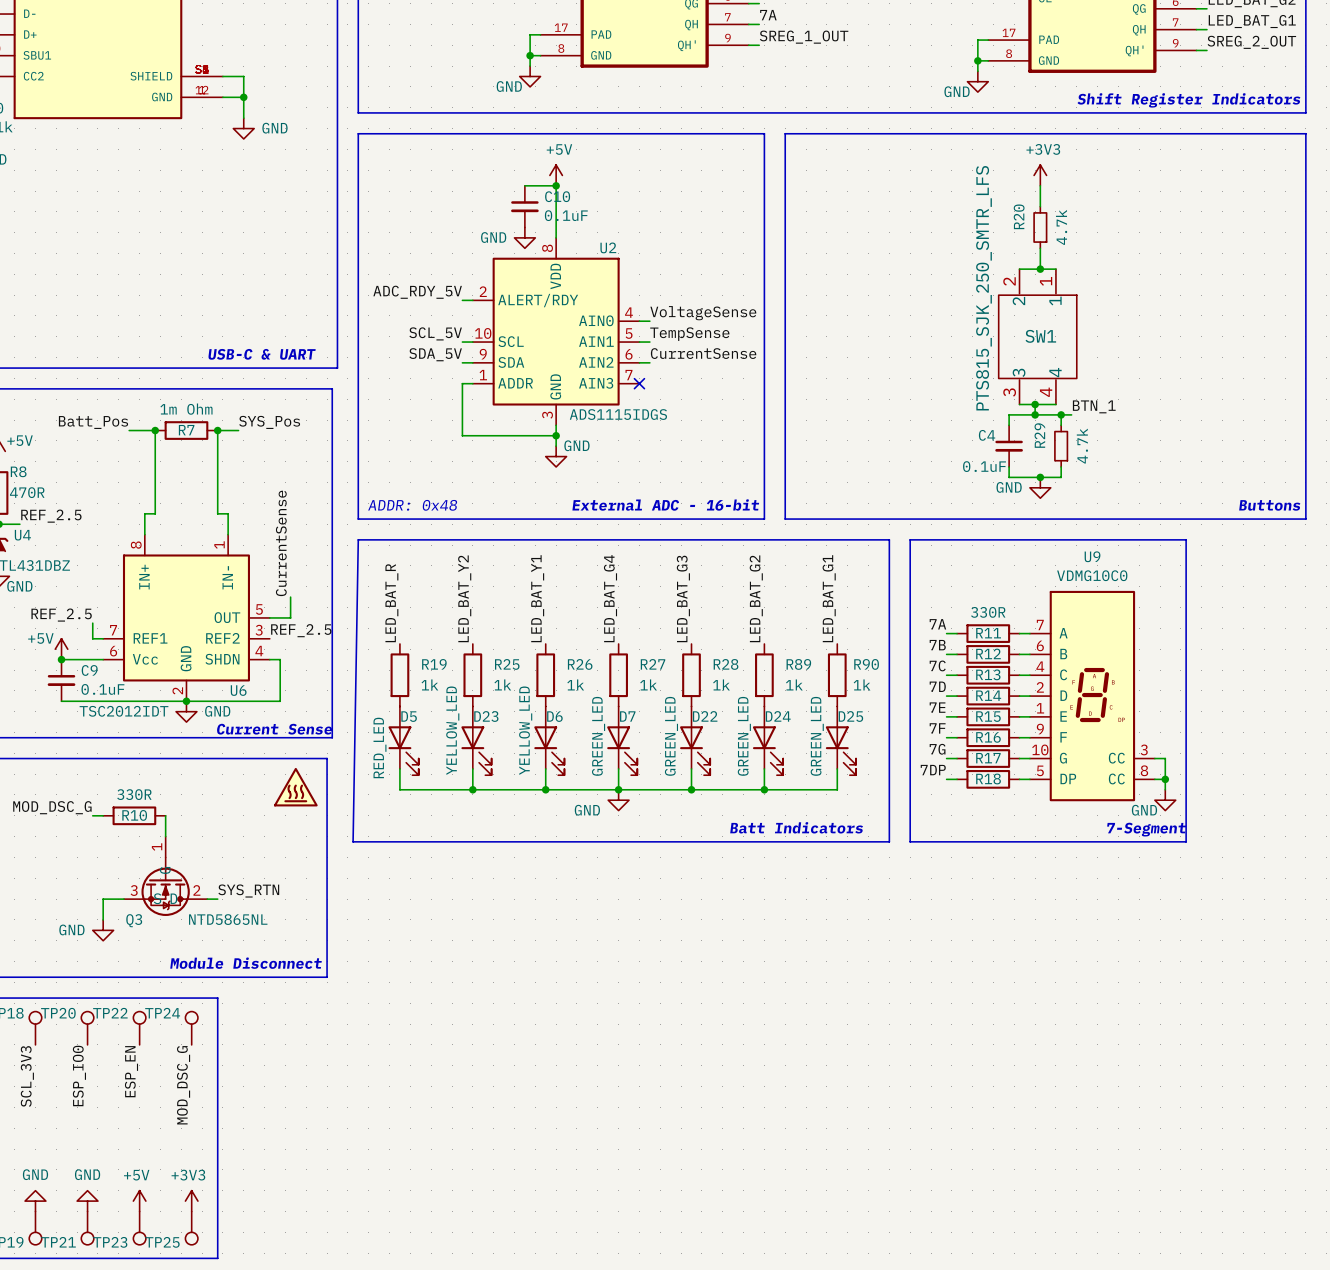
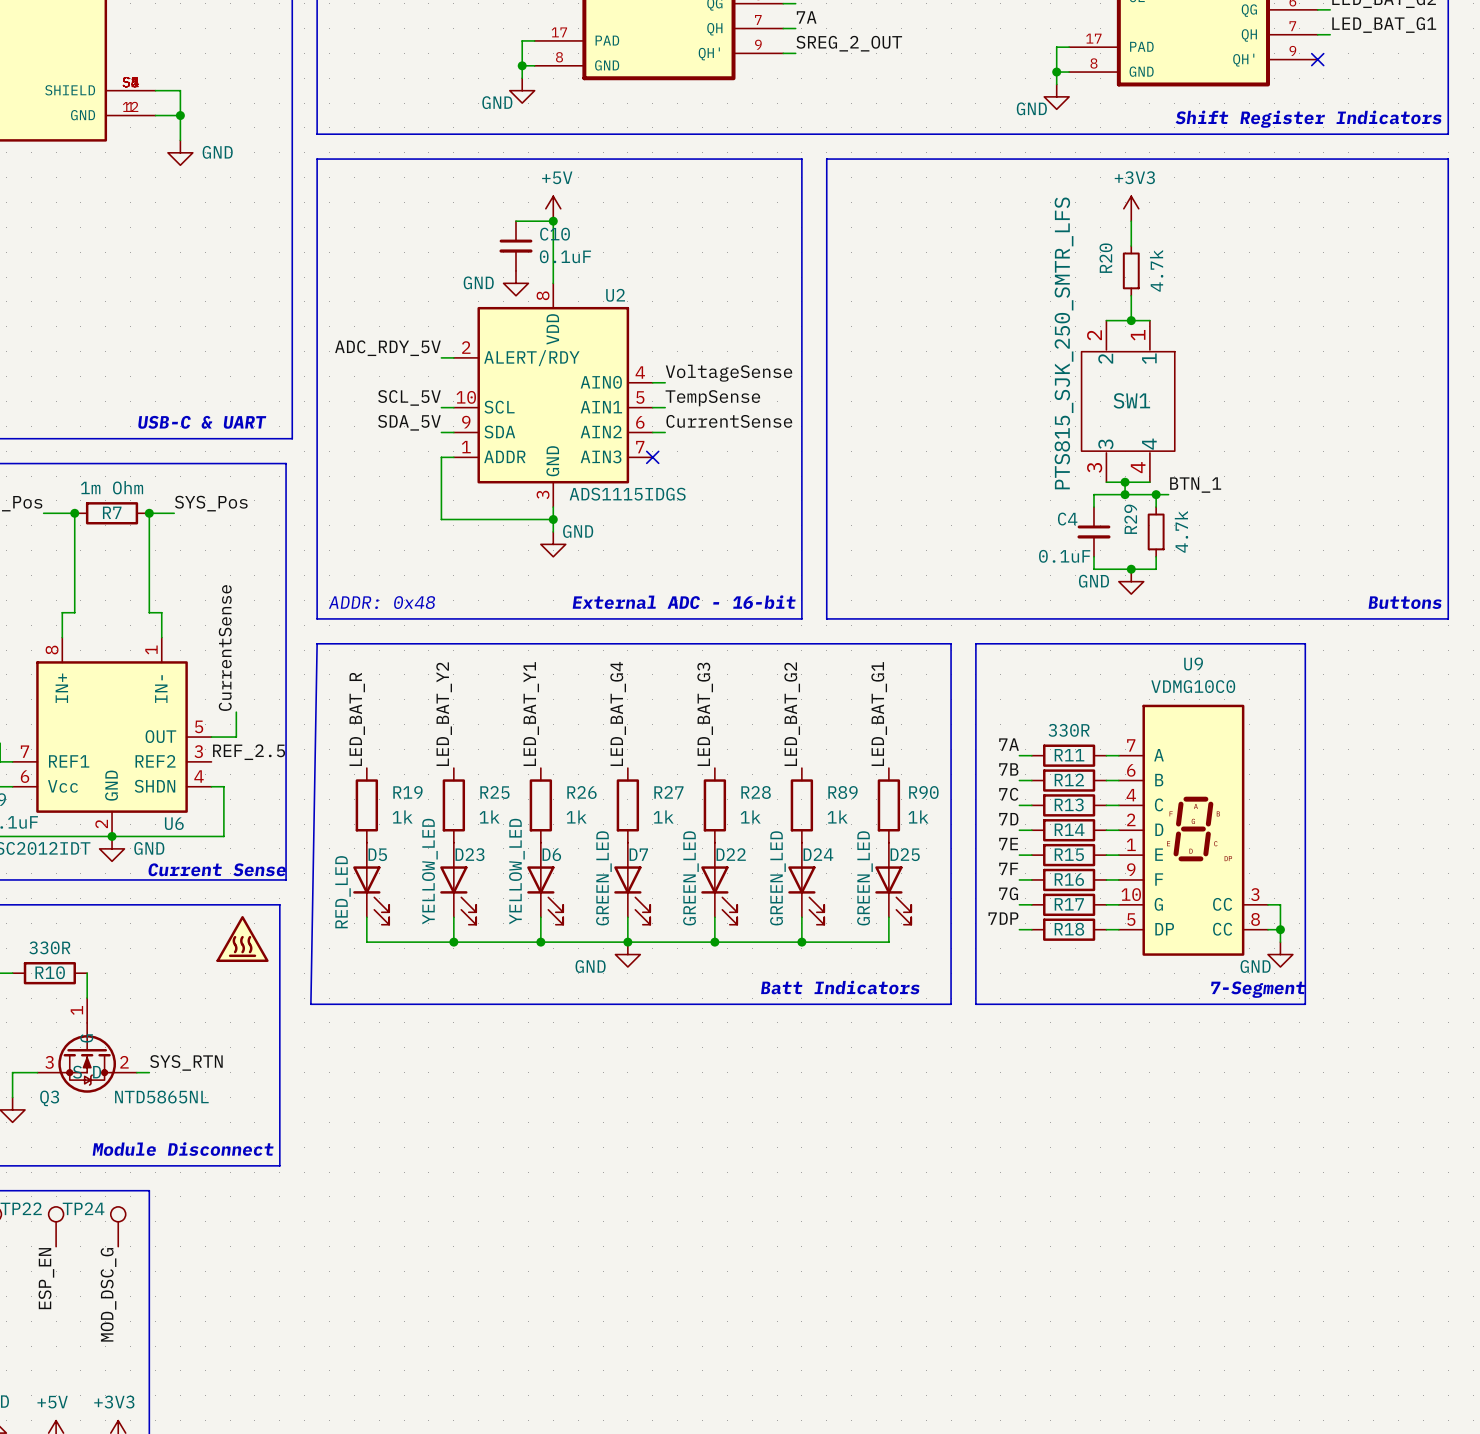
label: SREG_1_OUT (804, 37) -> SREG_2_OUT (849, 43)
label: SREG_2_OUT (1251, 42) -> none
wire: (1196, 50) (1206, 50) -> none
no-connect mark: none -> (1317, 59)

